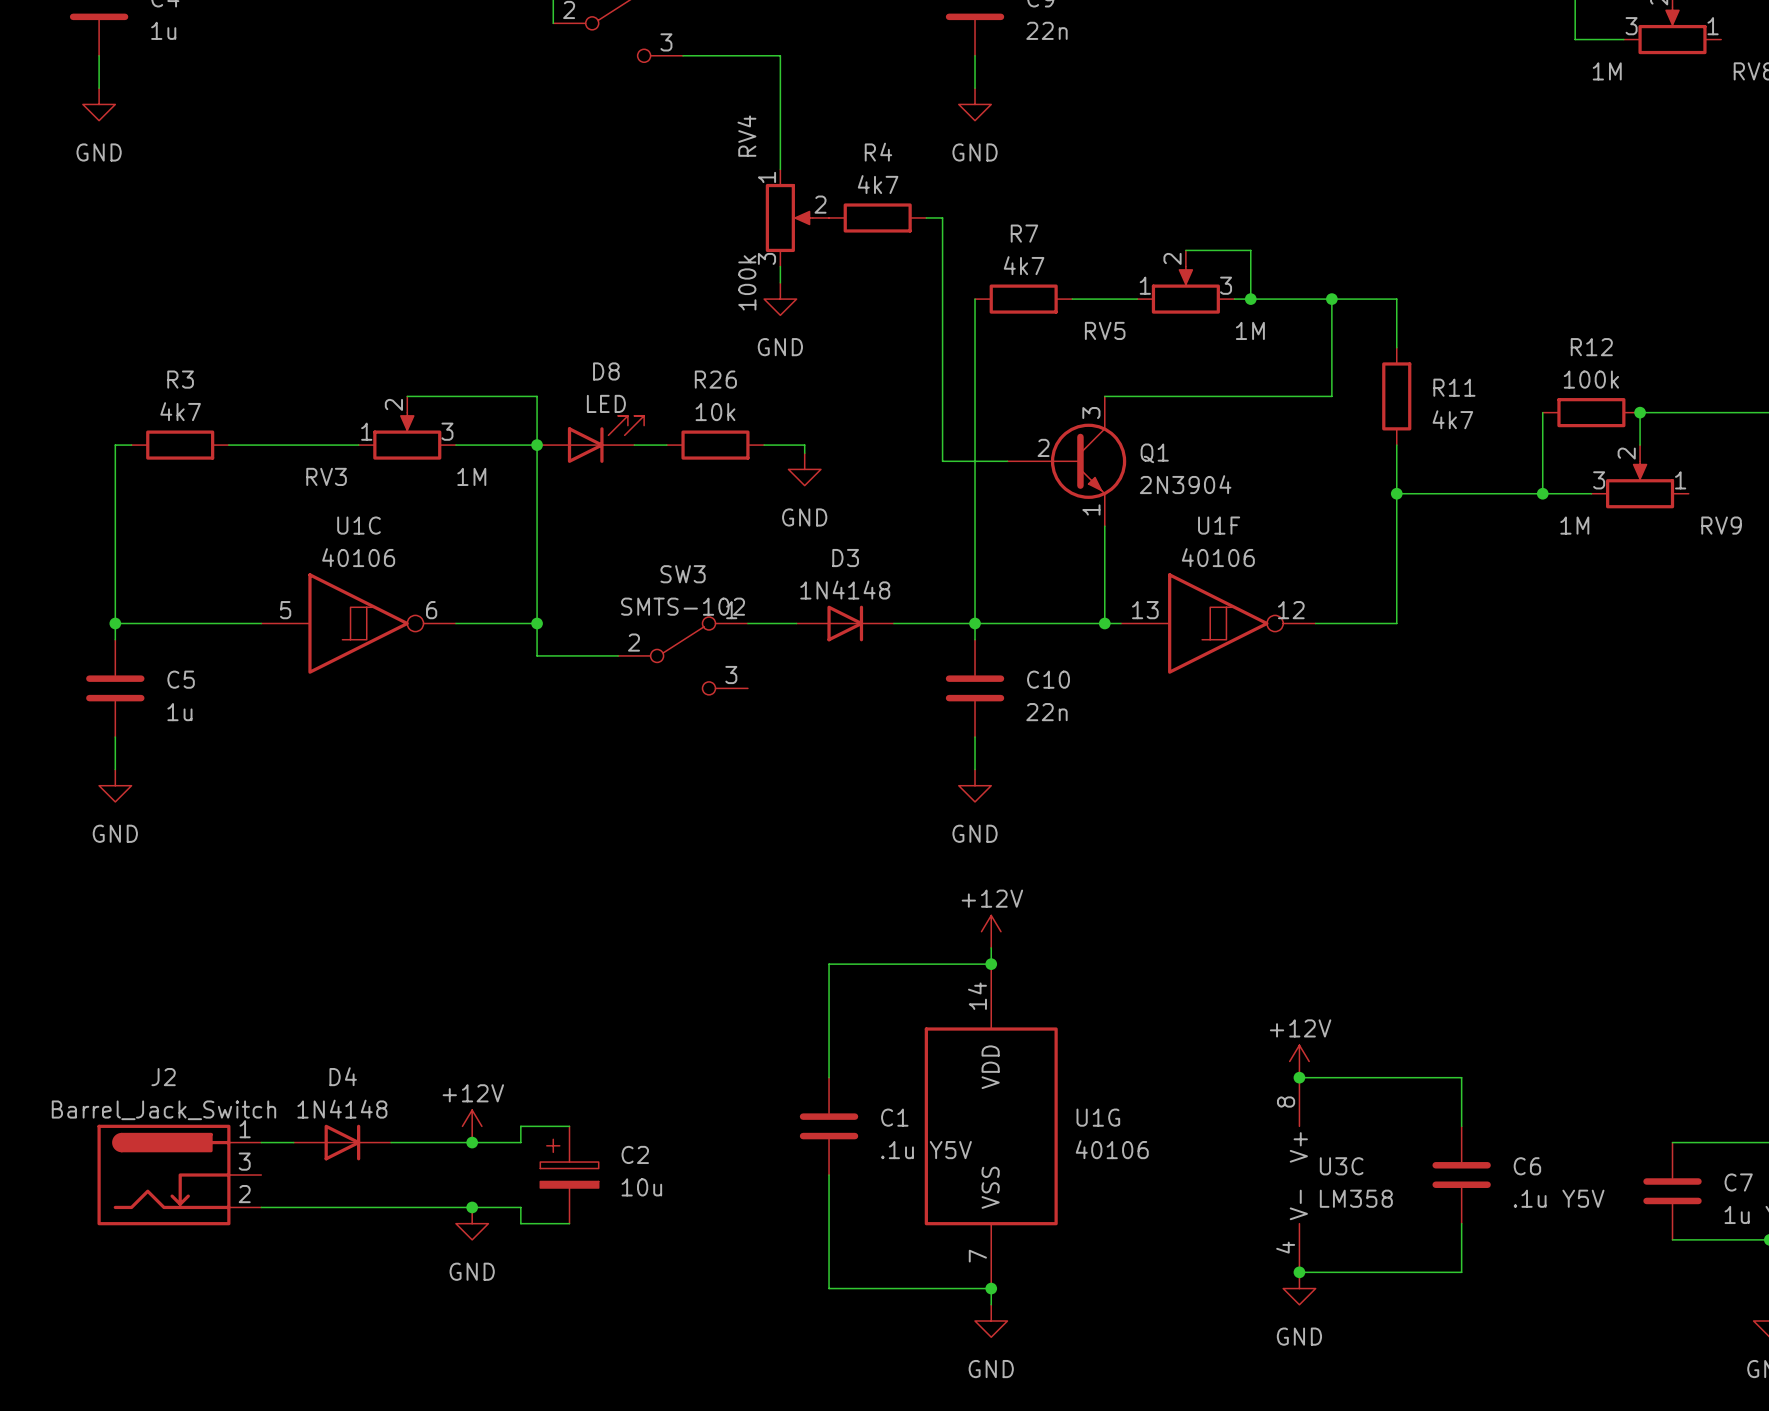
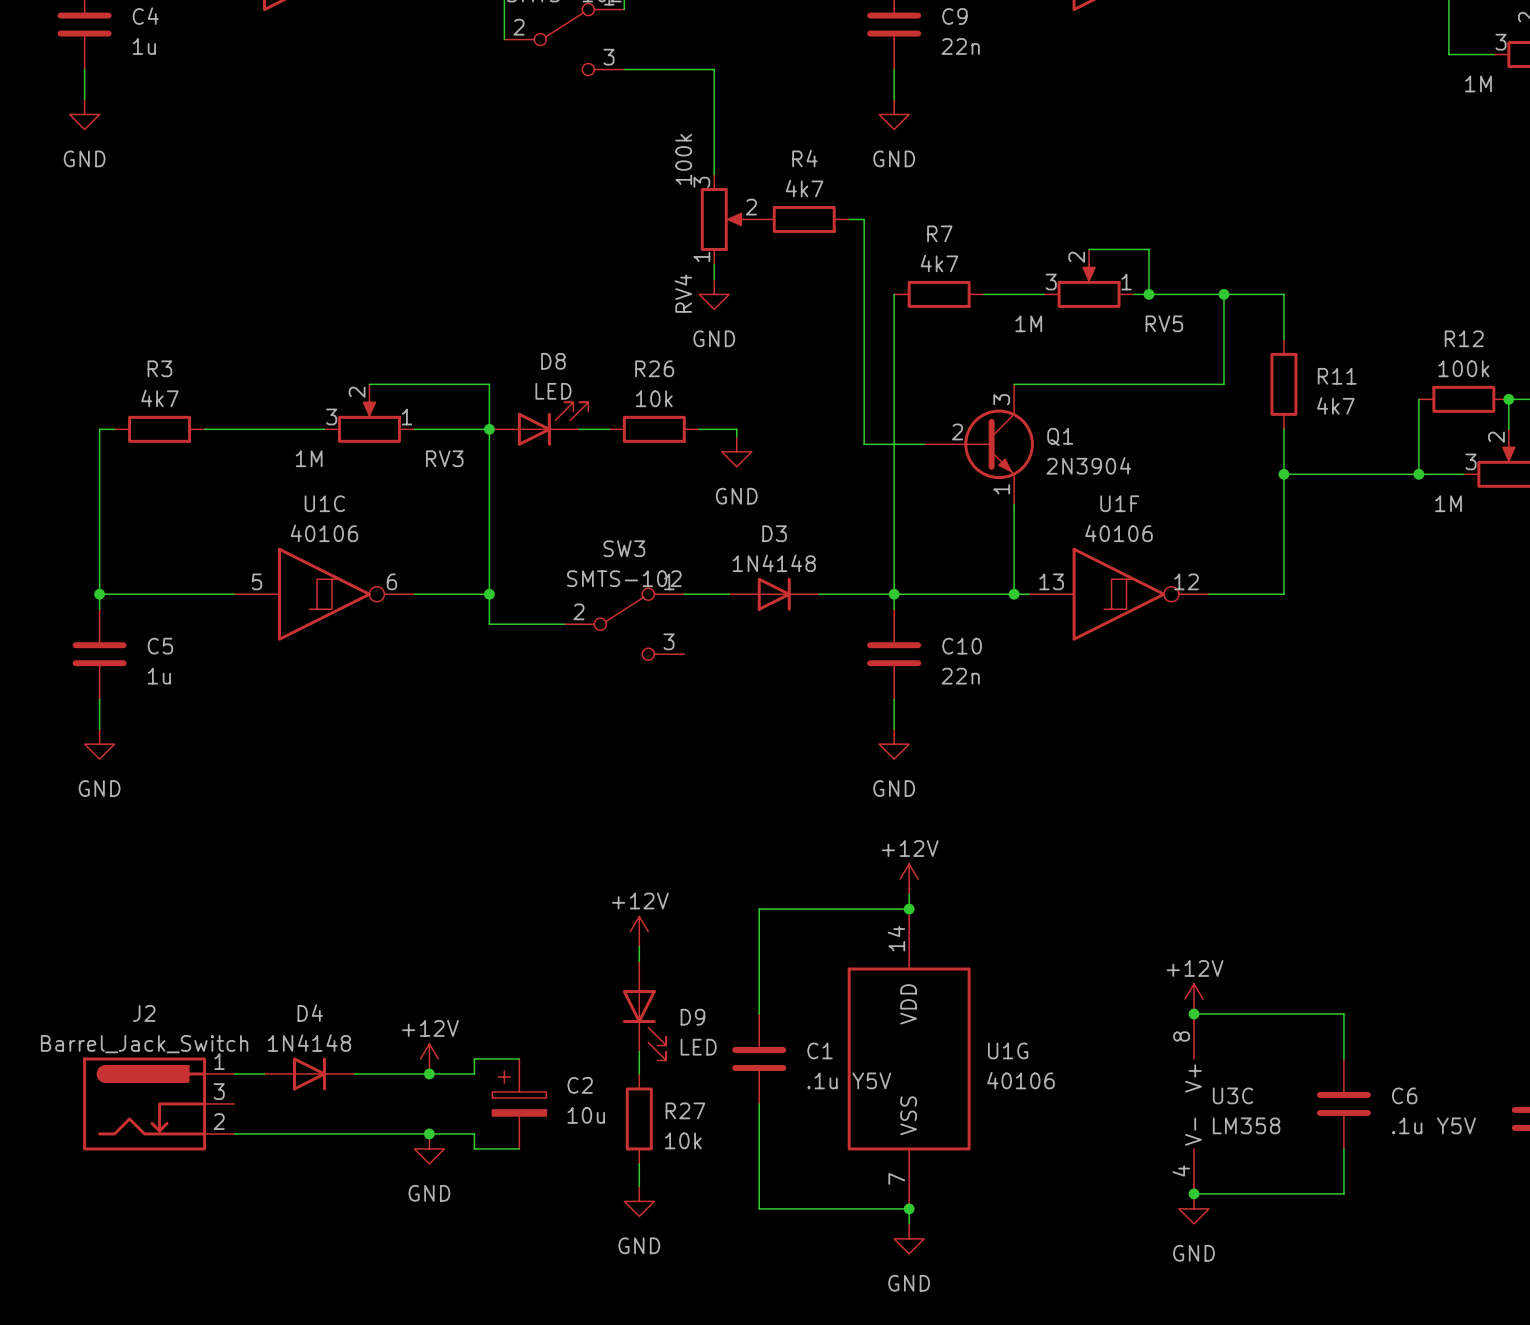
RV4 flip: as is (789, 217) -> up-down (722, 219)
RV5 flip: as is (1185, 290) -> left-right (1089, 286)
RV3 flip: as is (407, 436) -> left-right (369, 421)
power symbol: none -> +12V (639, 931)
wire: none -> (639, 946) (639, 961)
D9: none -> LED (644, 1011)
wire: none -> (639, 1051) (639, 1073)
R27: none -> 10k (639, 1118)
wire: none -> (639, 1163) (639, 1186)
power symbol: none -> GND (639, 1201)

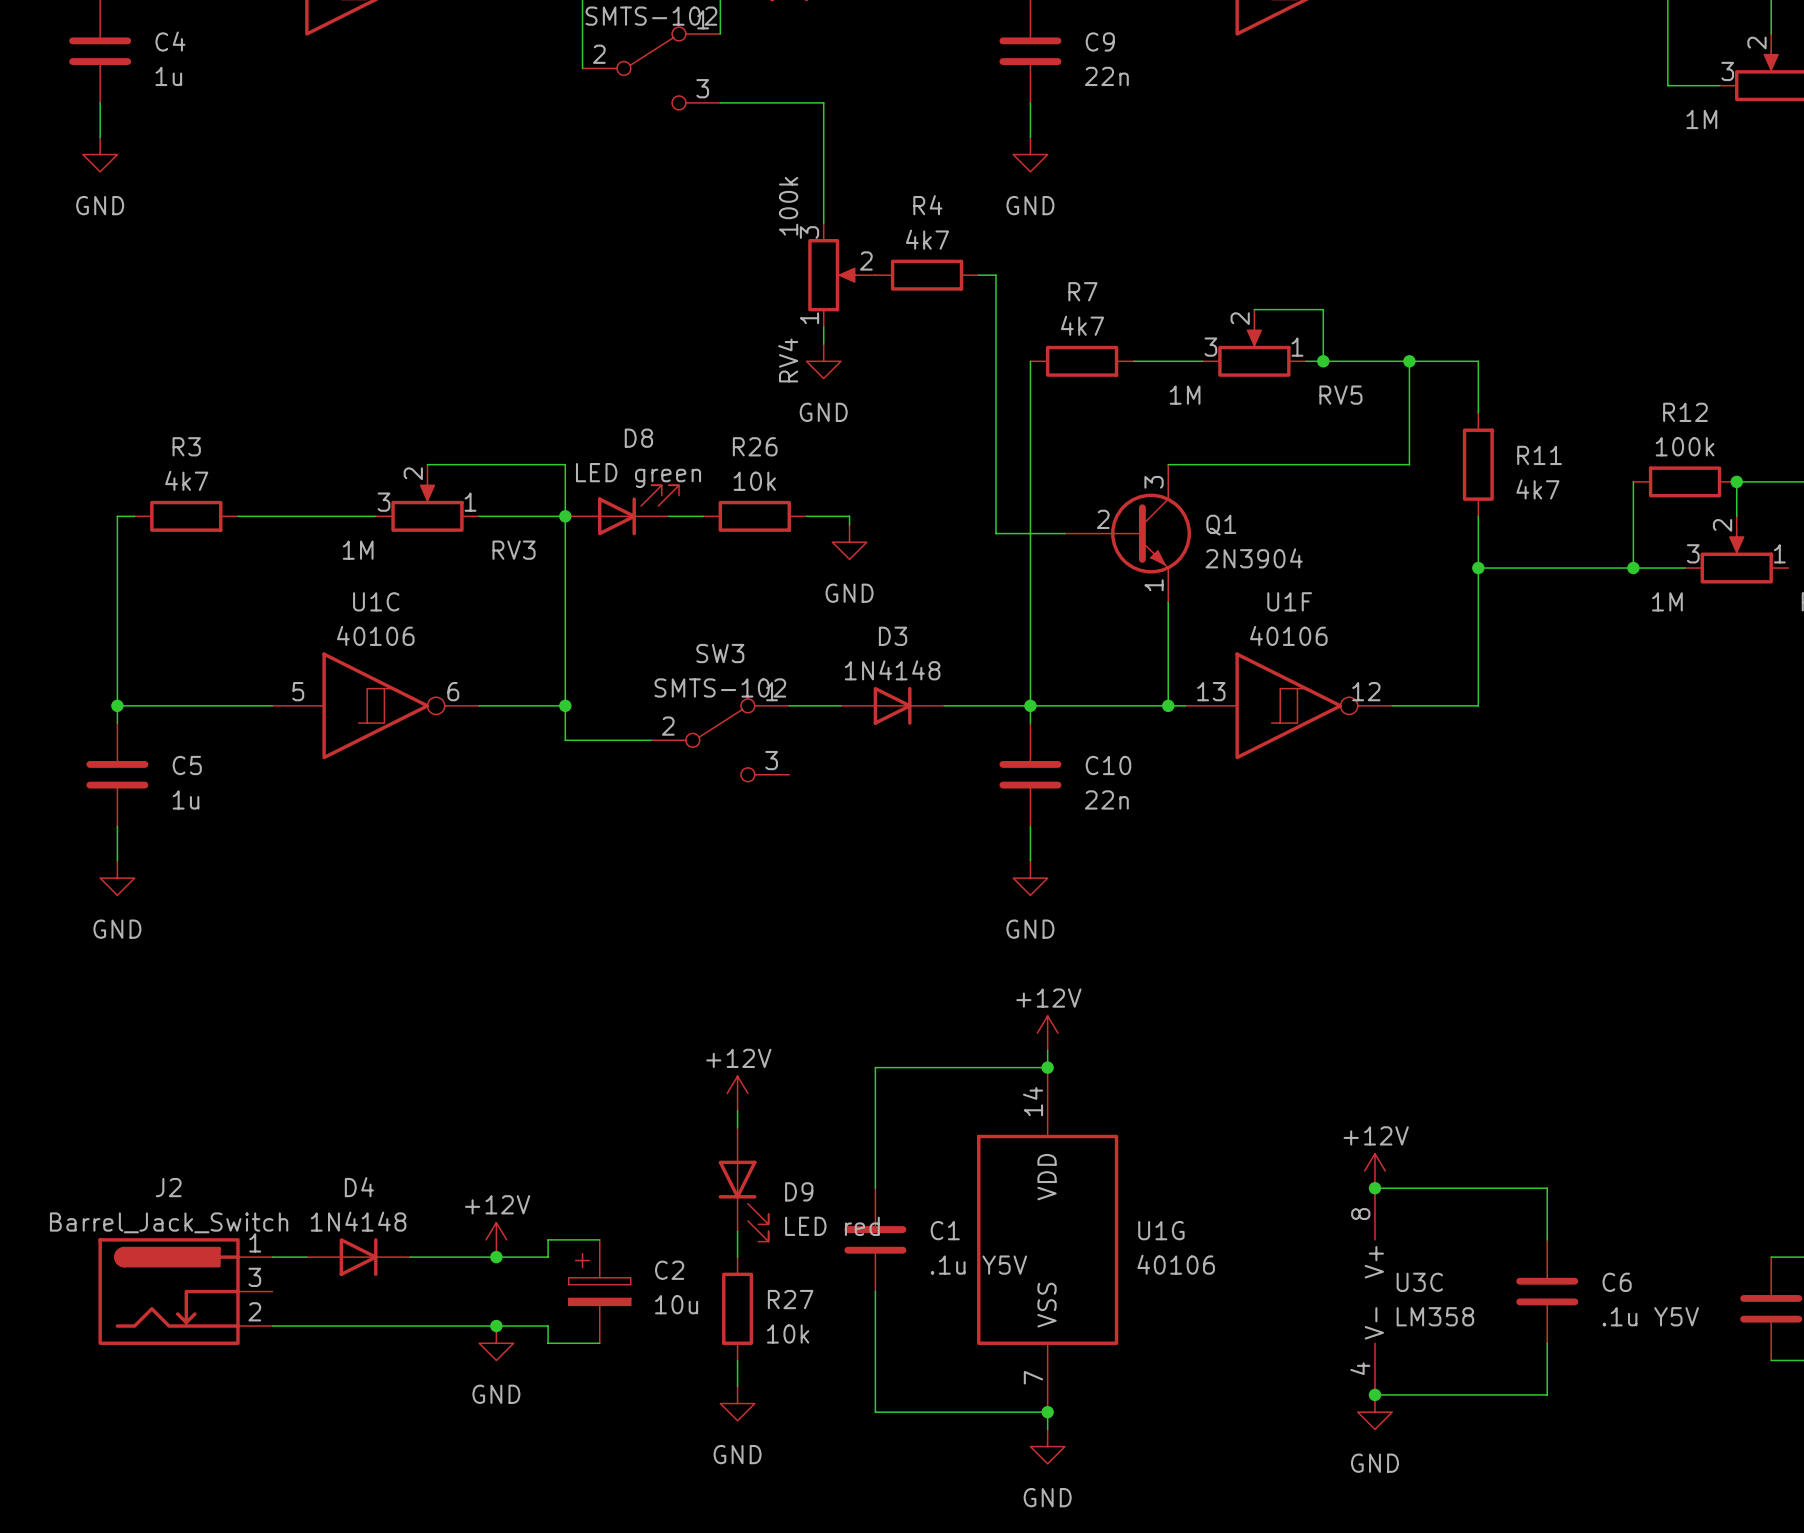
D8 value: LED (553, 391) -> LED green (638, 475)
D9 value: LED (698, 1047) -> LED red (832, 1226)

